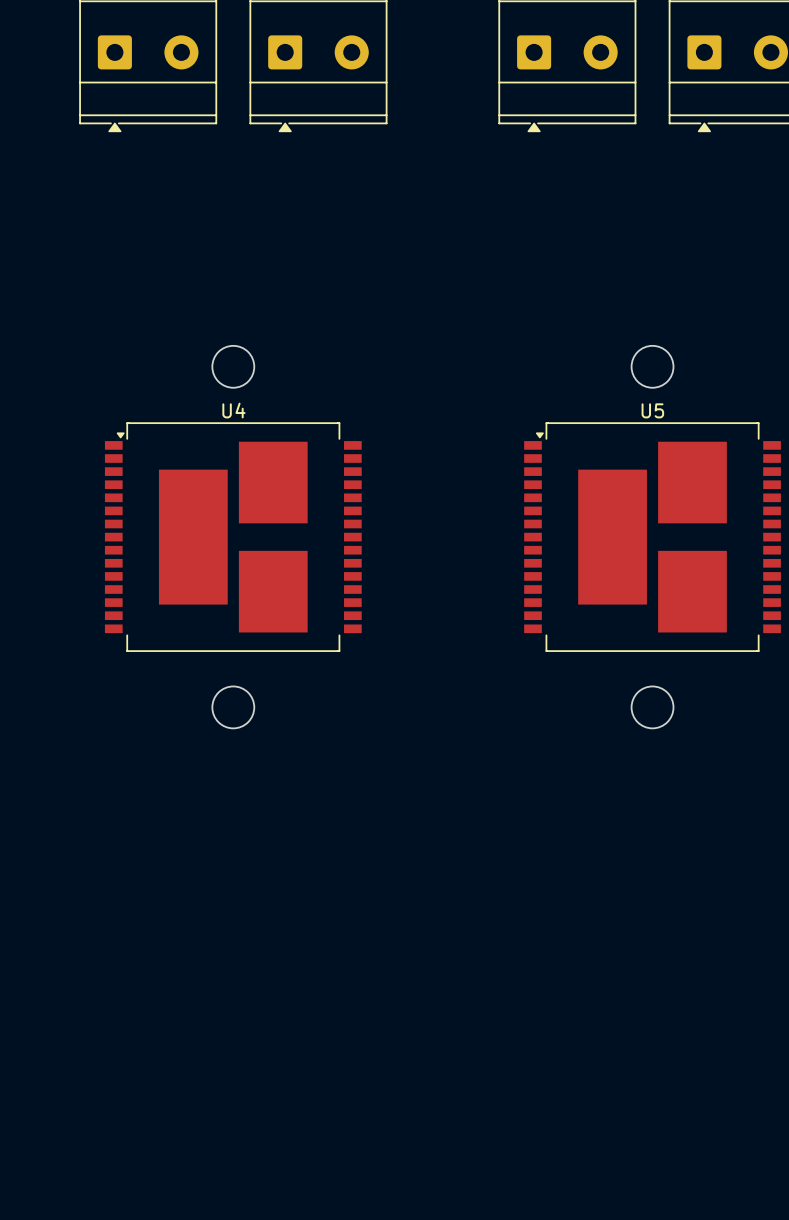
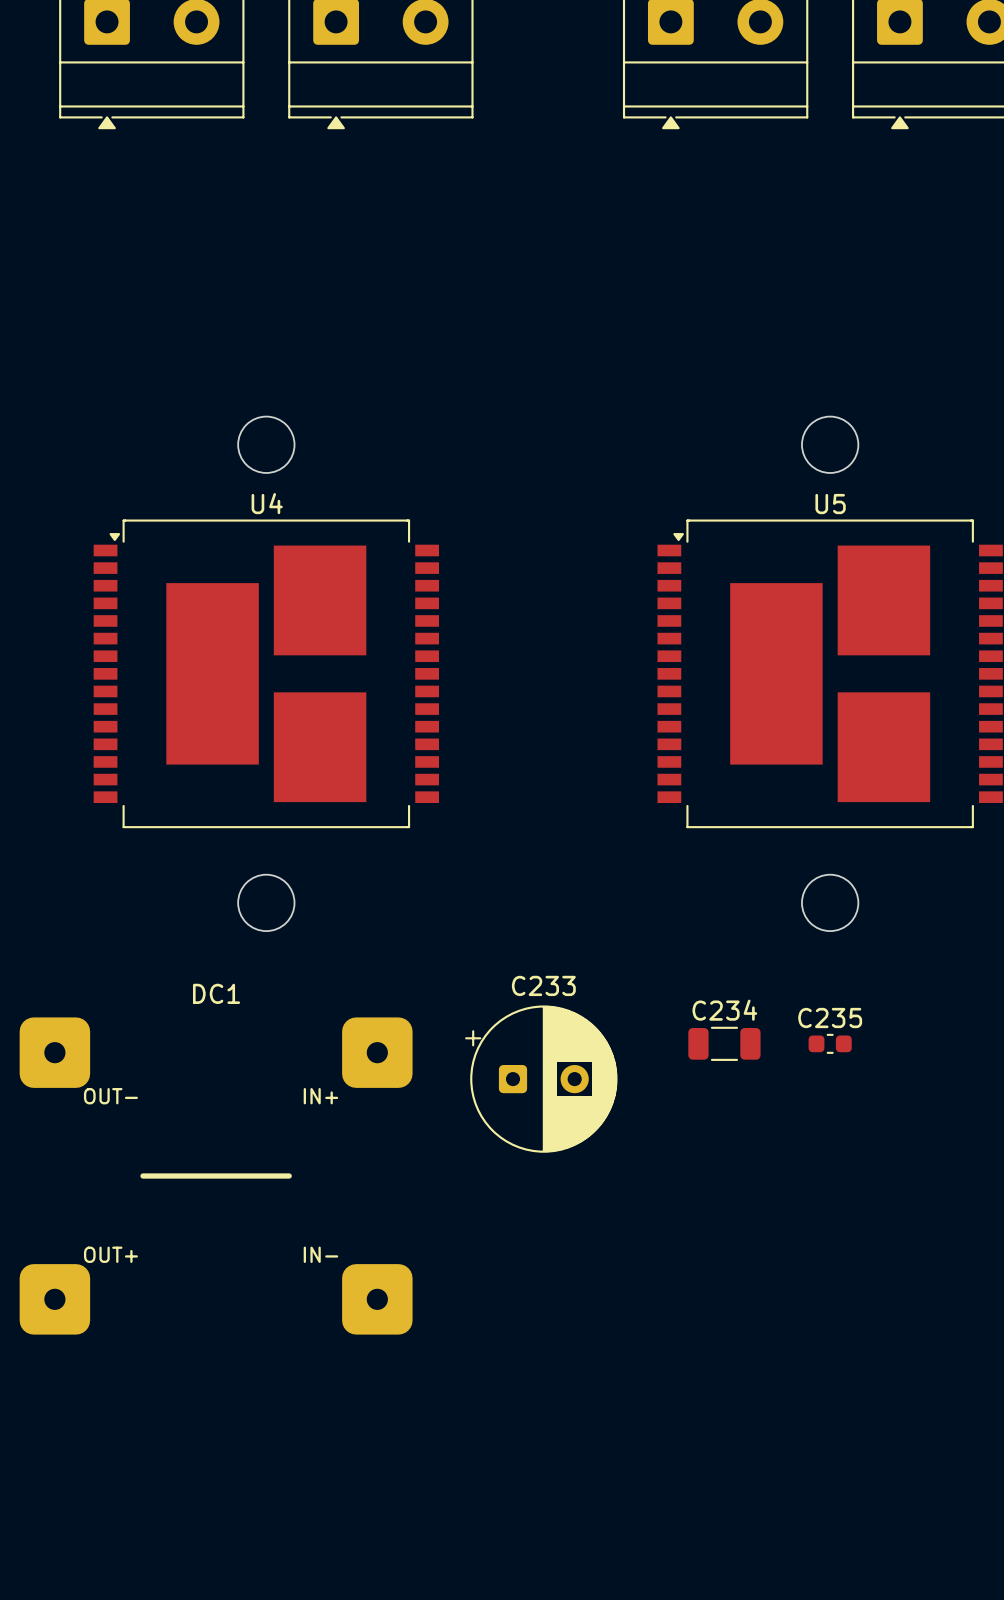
C234: none -> (724, 1043)
C235: none -> (830, 1043)
C233: none -> (541, 1079)
DC1: none -> (216, 1176)

